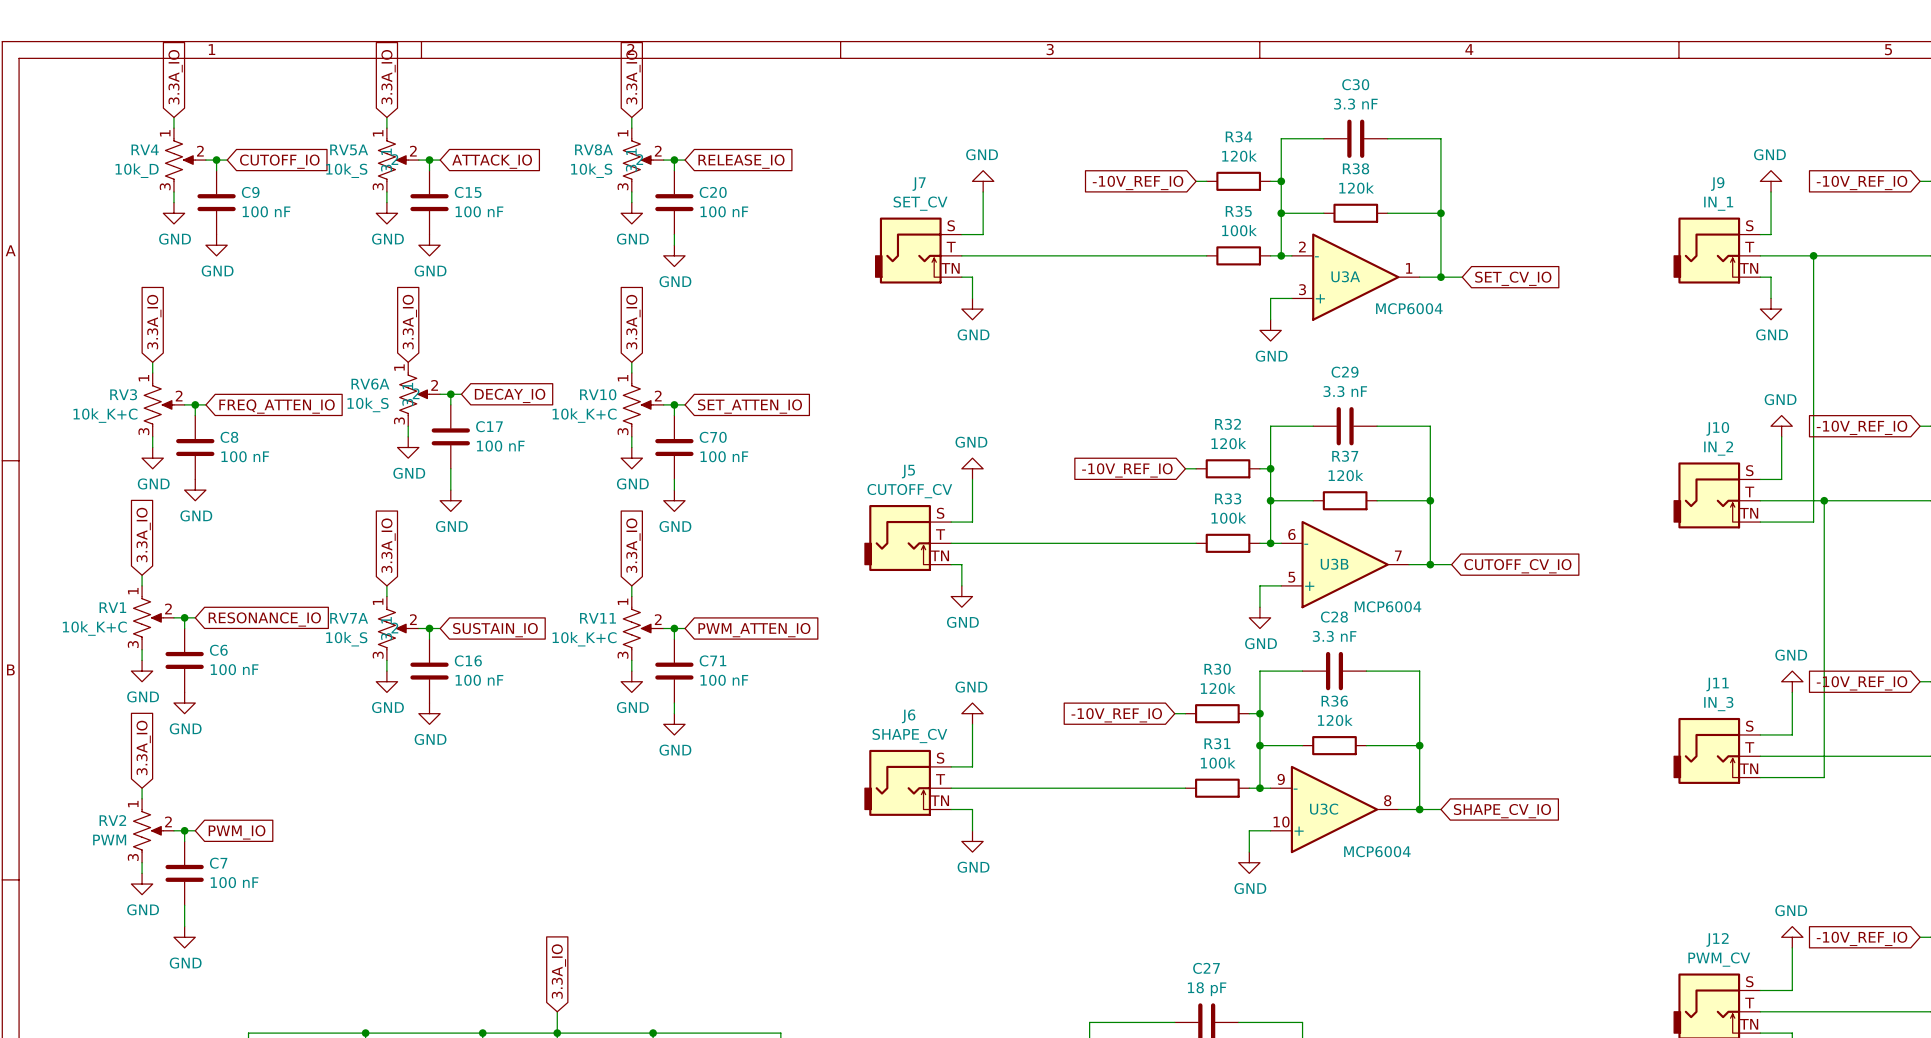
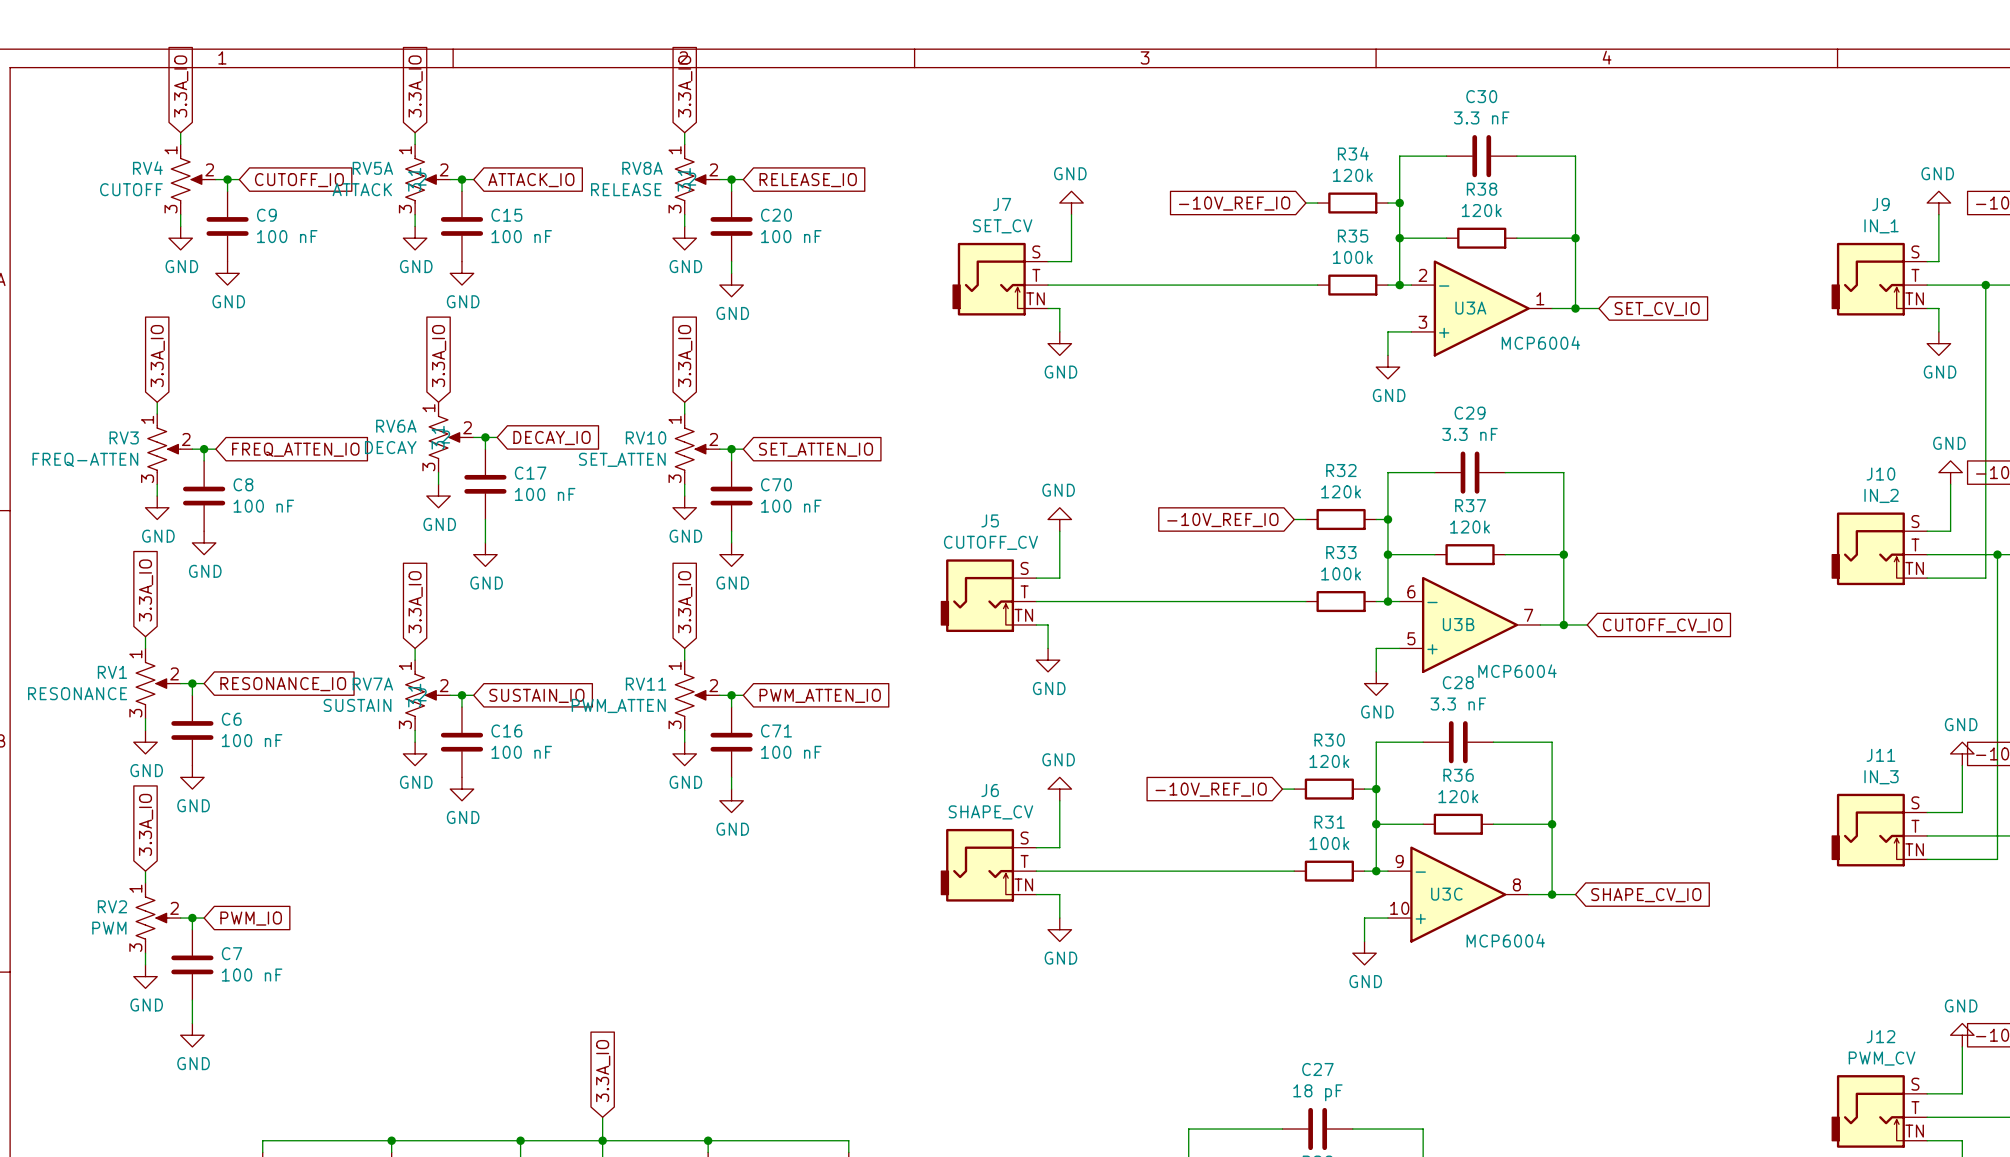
RV4 value: 10k_D (137, 170) -> CUTOFF (131, 189)
RV5A value: 10k_S (346, 170) -> ATTACK (362, 189)
RV8A value: 10k_S (591, 170) -> RELEASE (626, 189)
RV6A value: 10k_S (368, 404) -> DECAY (390, 447)
RV3 value: 10k_K+C (105, 415) -> FREQ-ATTEN (85, 459)
RV10 value: 10k_K+C (584, 415) -> SET_ATTEN (622, 459)
RV1 value: 10k_K+C (94, 628) -> RESONANCE (77, 693)
RV7A value: 10k_S (346, 639) -> SUSTAIN (357, 705)
RV11 value: 10k_K+C (584, 639) -> PWM_ATTEN (618, 705)

